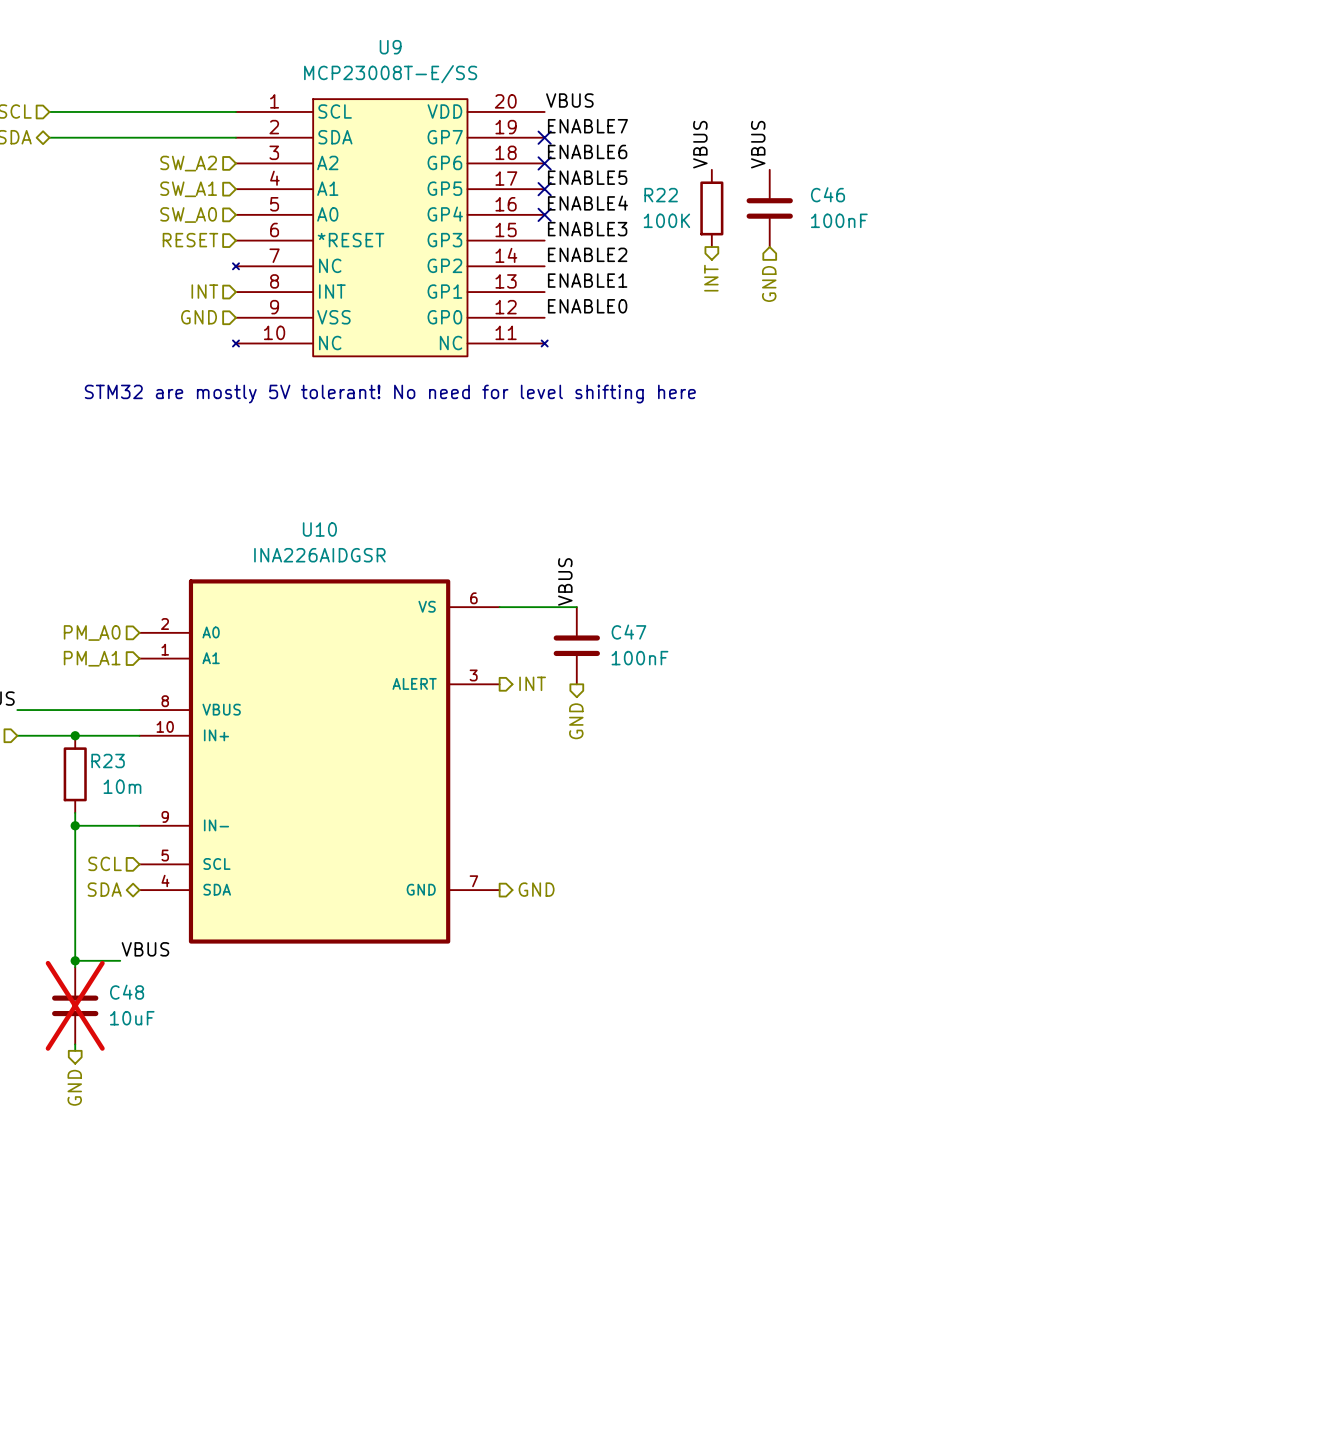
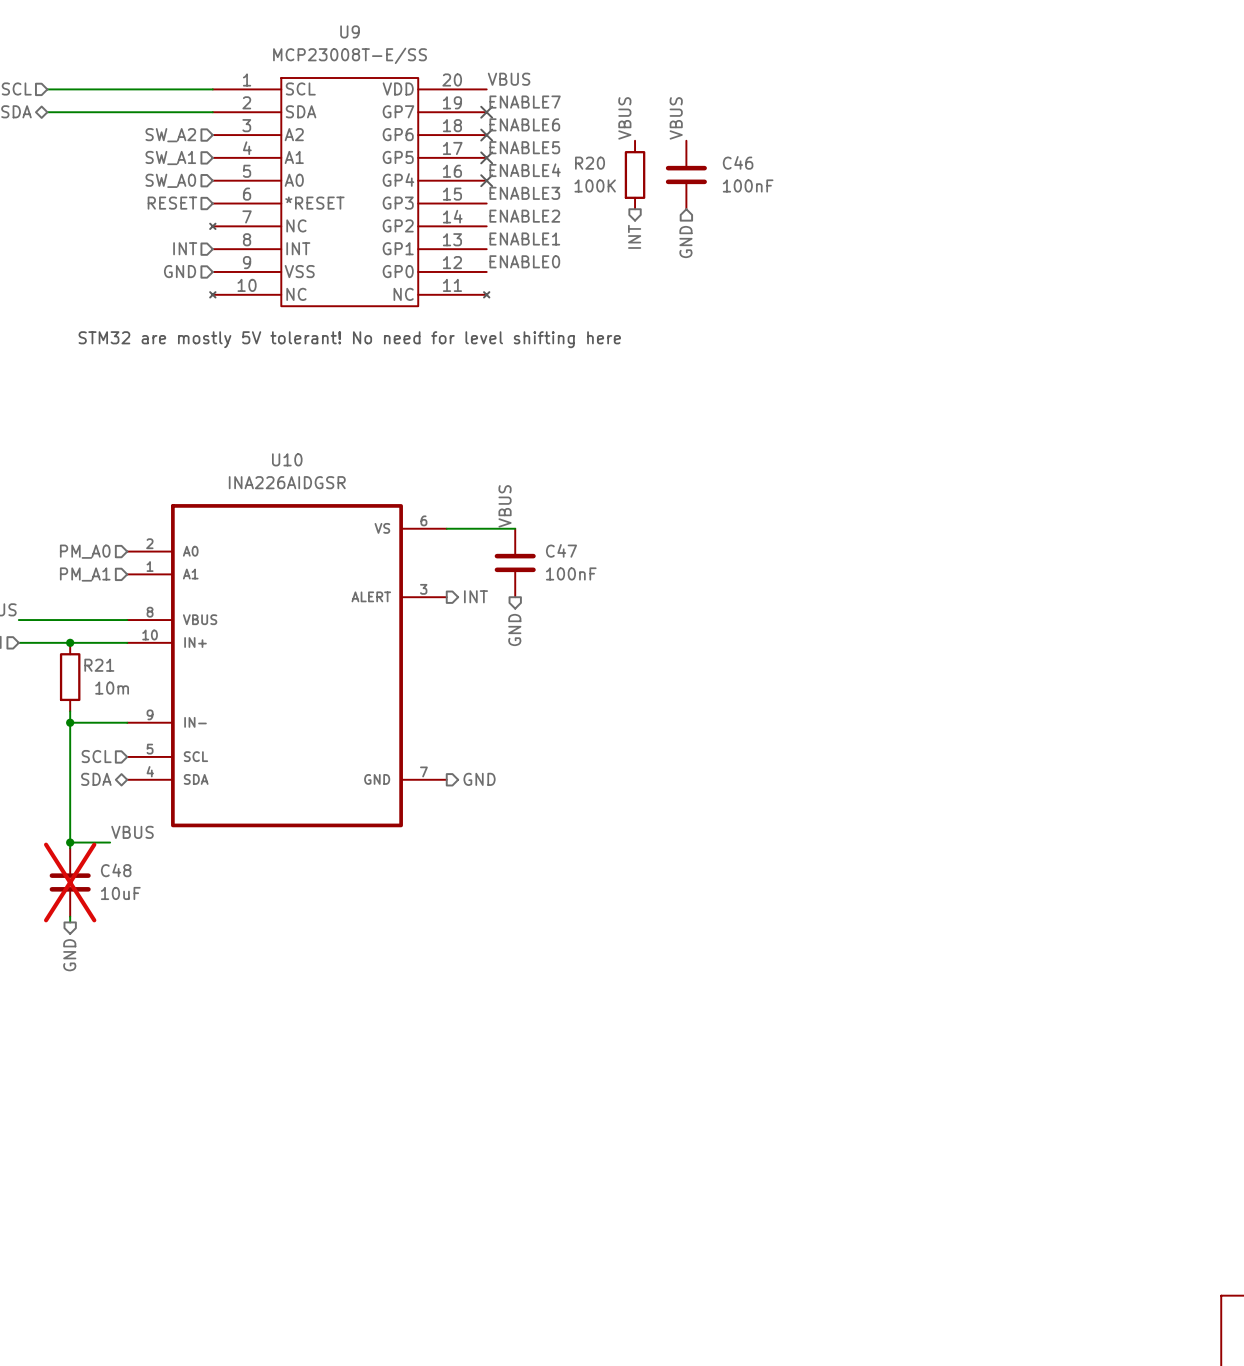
R22 name: R22 (661, 195) -> R20 (590, 163)
R23 name: R23 (108, 760) -> R21 (99, 665)

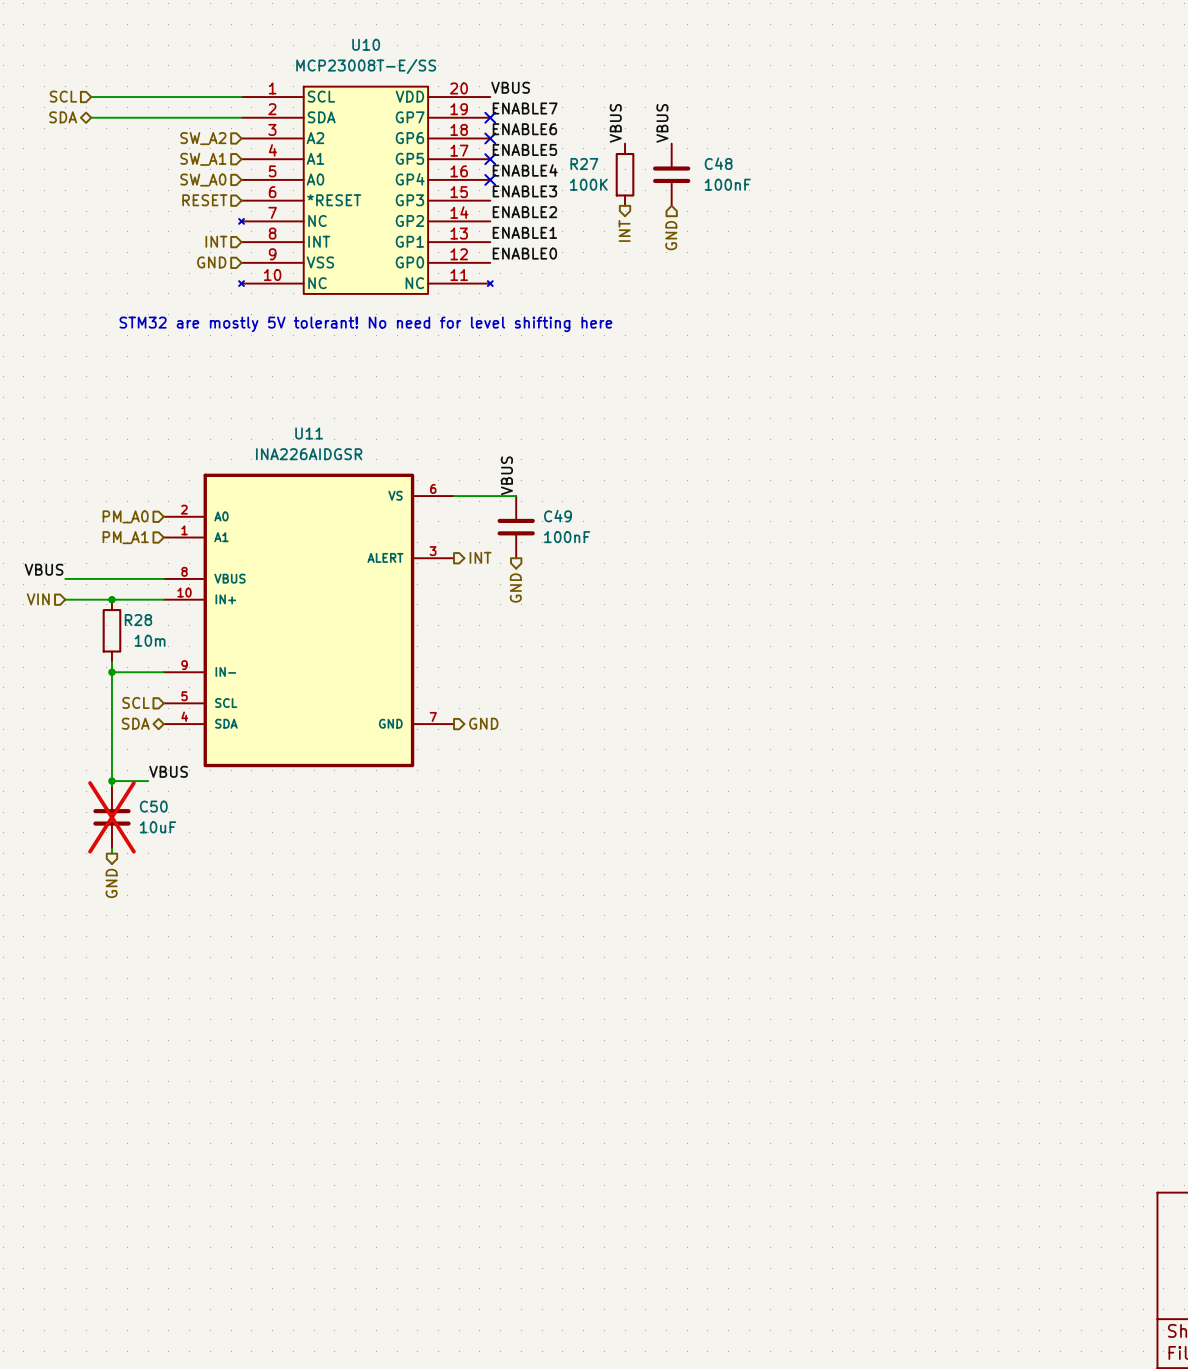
U9 name: U9 (350, 31) -> U10 (366, 44)
C46 name: C46 (738, 162) -> C48 (718, 163)
R20 name: R20 (590, 163) -> R27 (584, 164)
U10 name: U10 (287, 459) -> U11 (309, 433)
C47 name: C47 (561, 550) -> C49 (557, 516)
R21 name: R21 (99, 665) -> R28 (138, 620)
C48 name: C48 (116, 870) -> C50 (153, 806)

